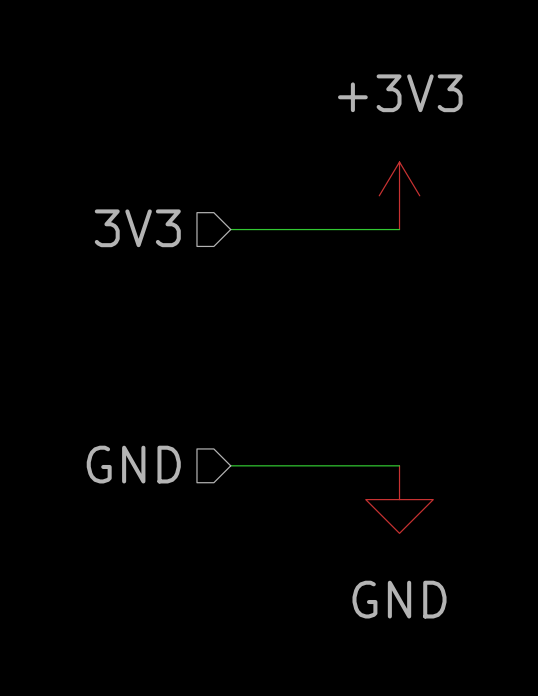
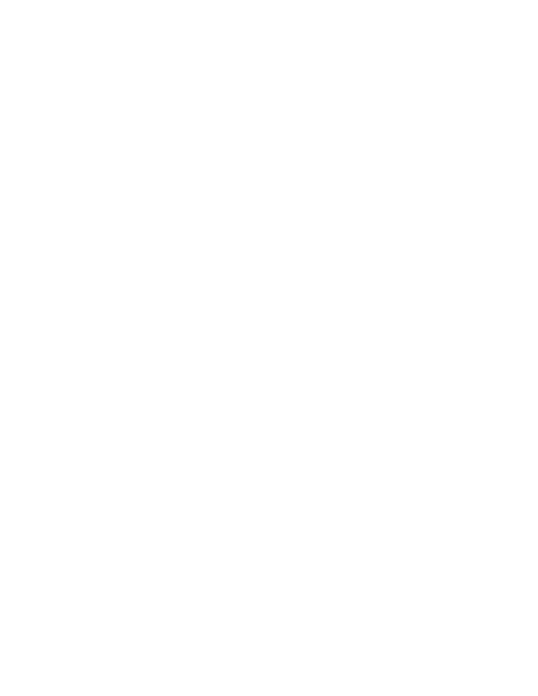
power symbol: +3V3 (399, 195) -> none
hierarchical label: 3V3 (137, 228) -> none
wire: (230, 229) (399, 229) -> none
hierarchical label: GND (133, 464) -> none
wire: (230, 465) (399, 465) -> none
power symbol: GND (399, 499) -> none

